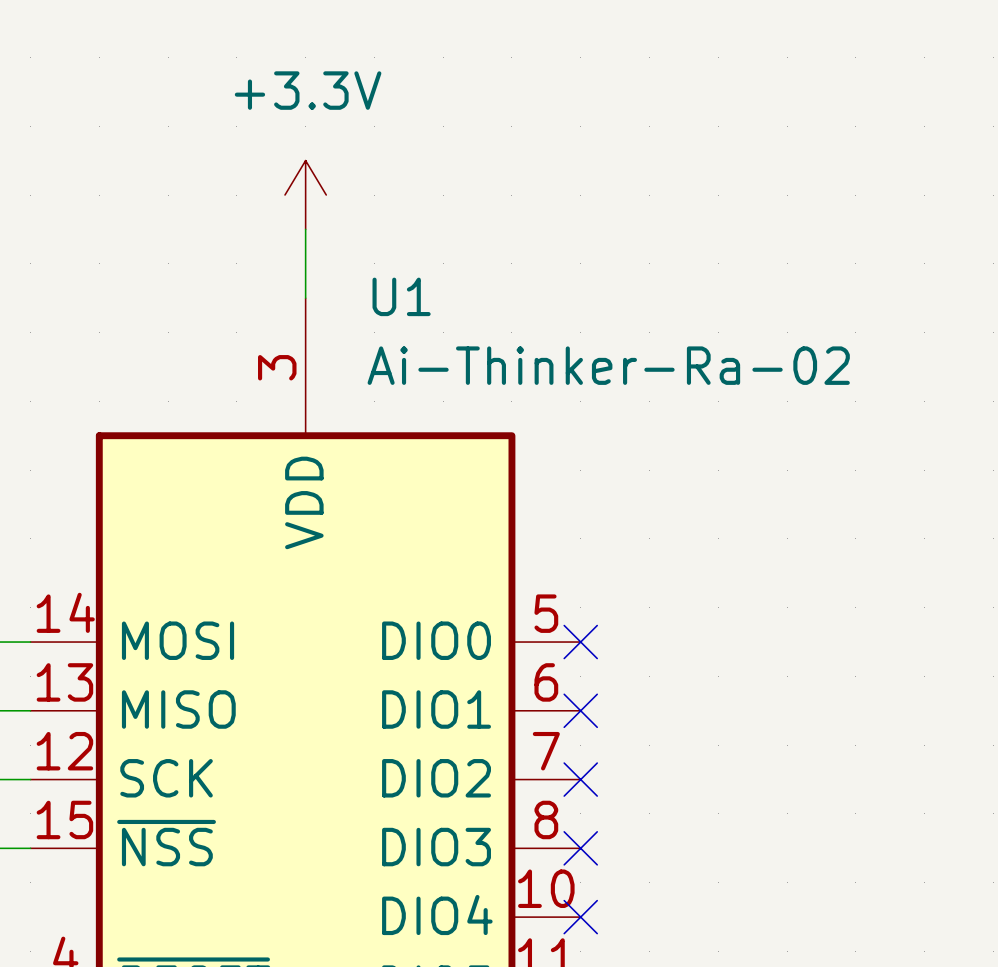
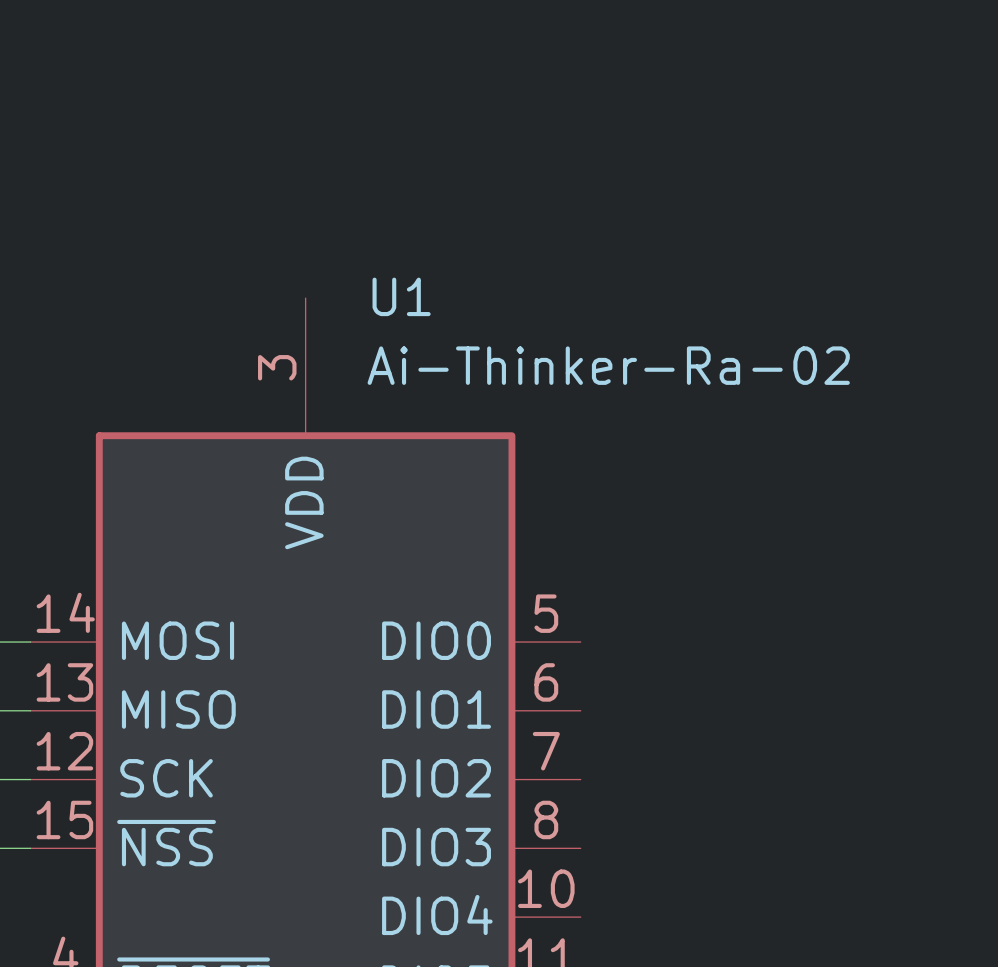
power symbol: +3.3V (305, 195) -> none
wire: (305, 229) (305, 298) -> none
no-connect mark: (580, 642) -> none
no-connect mark: (580, 710) -> none
no-connect mark: (580, 779) -> none
no-connect mark: (580, 848) -> none
no-connect mark: (580, 917) -> none

